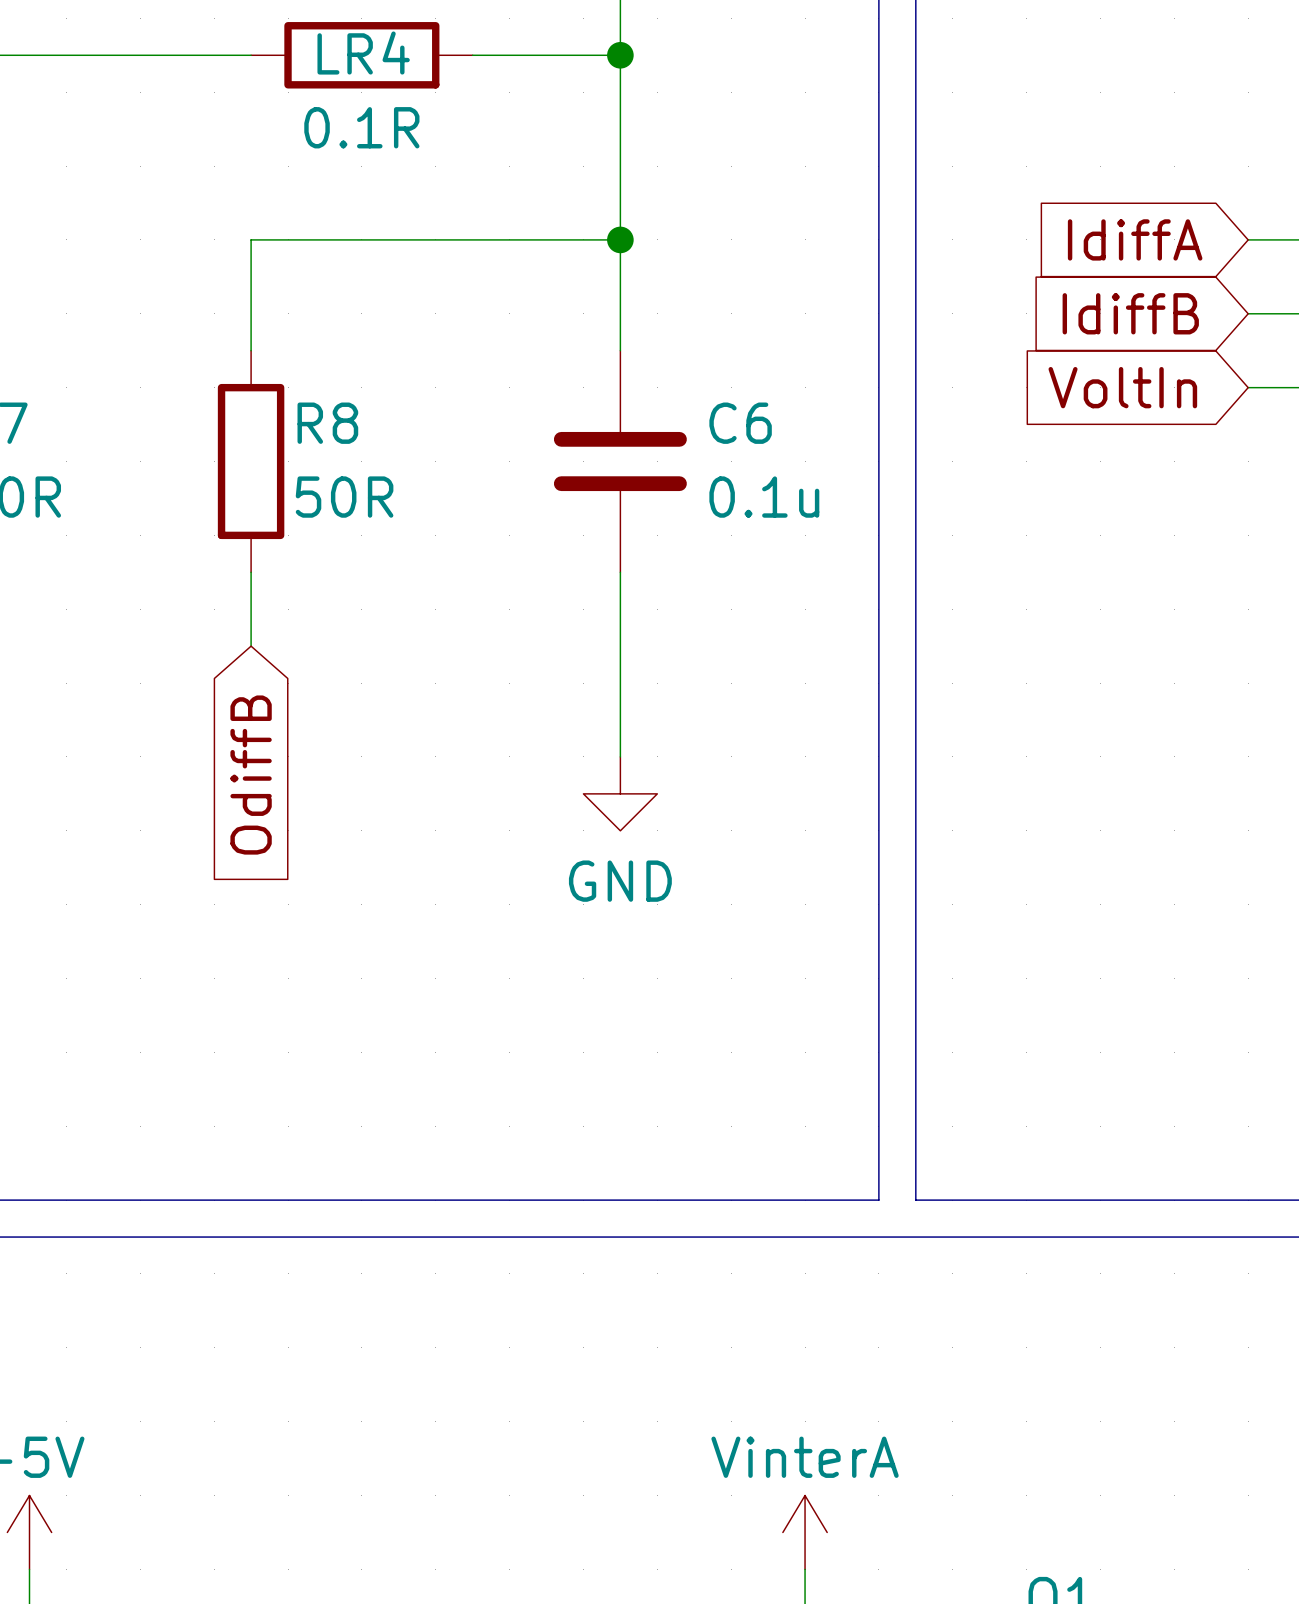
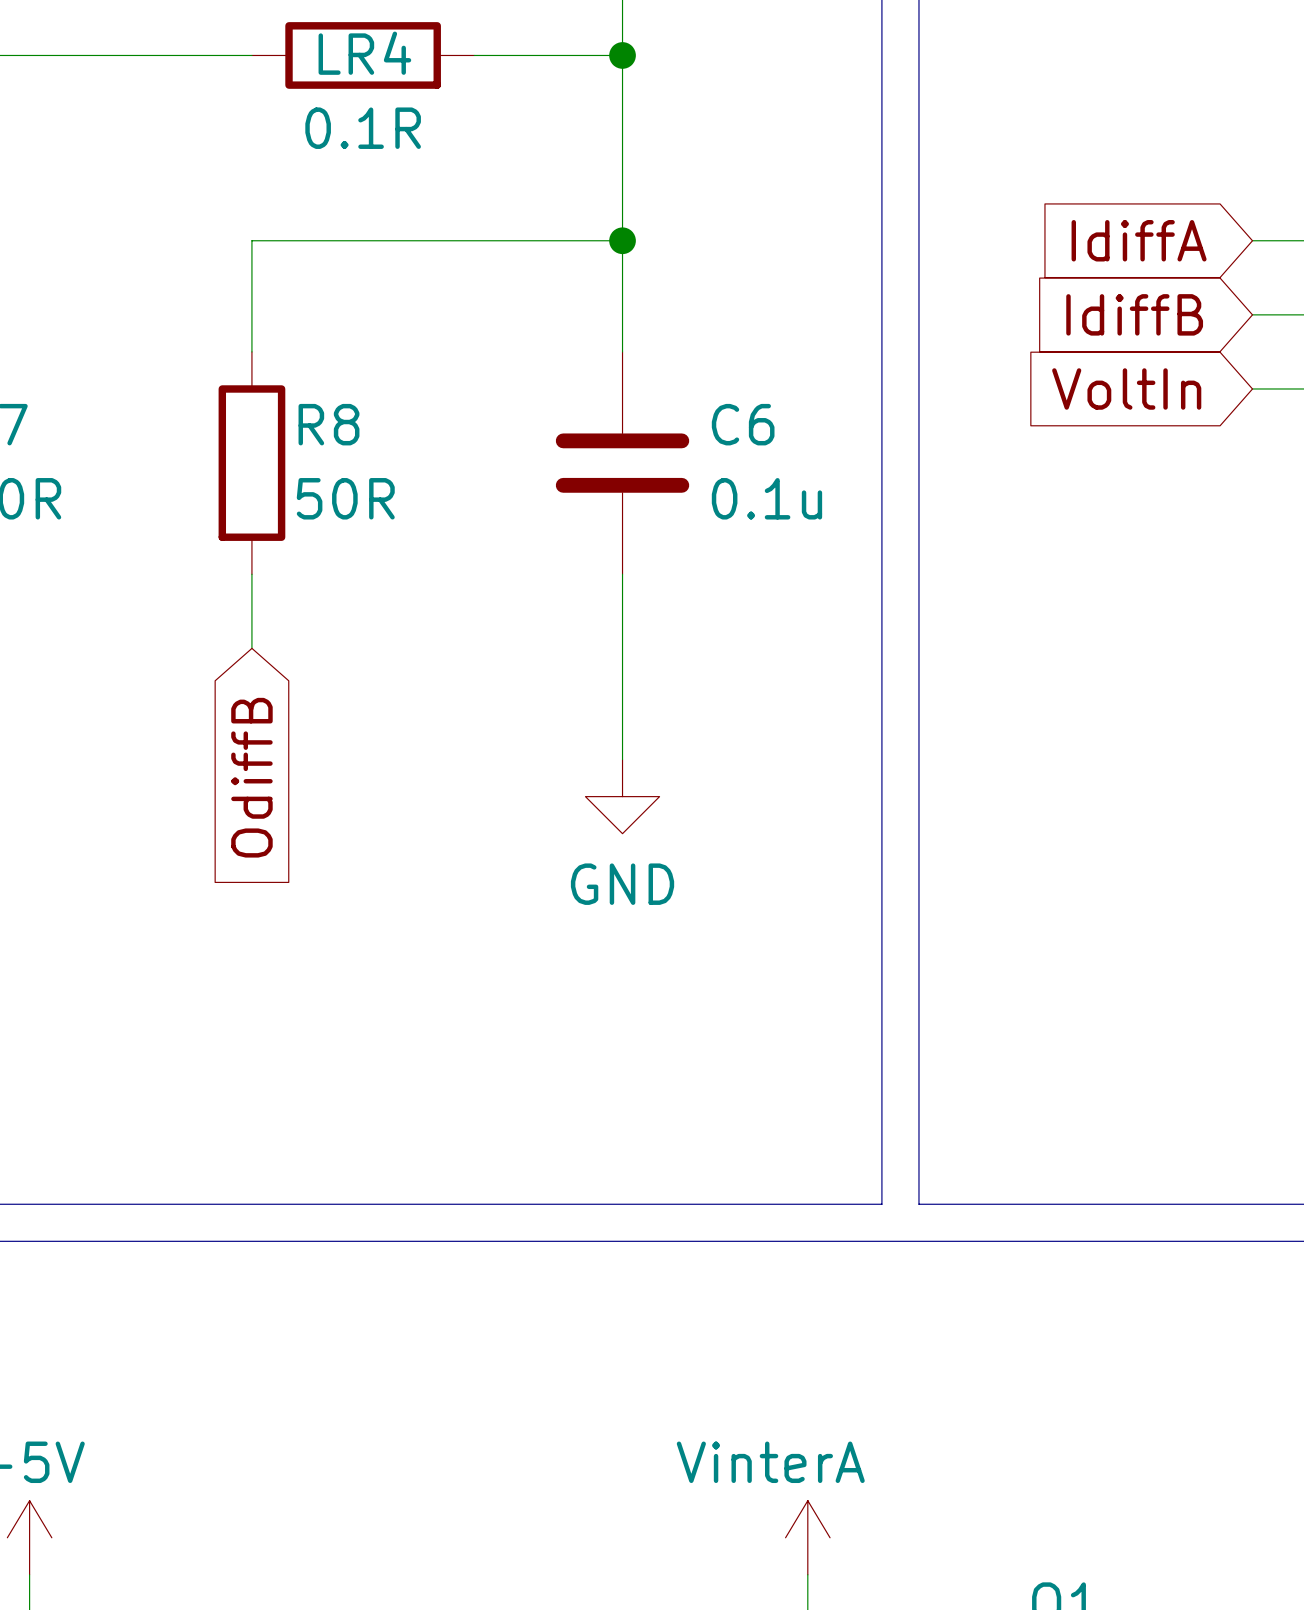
power symbol text position: VinterA (805, 1457) -> VinterA (770, 1462)

